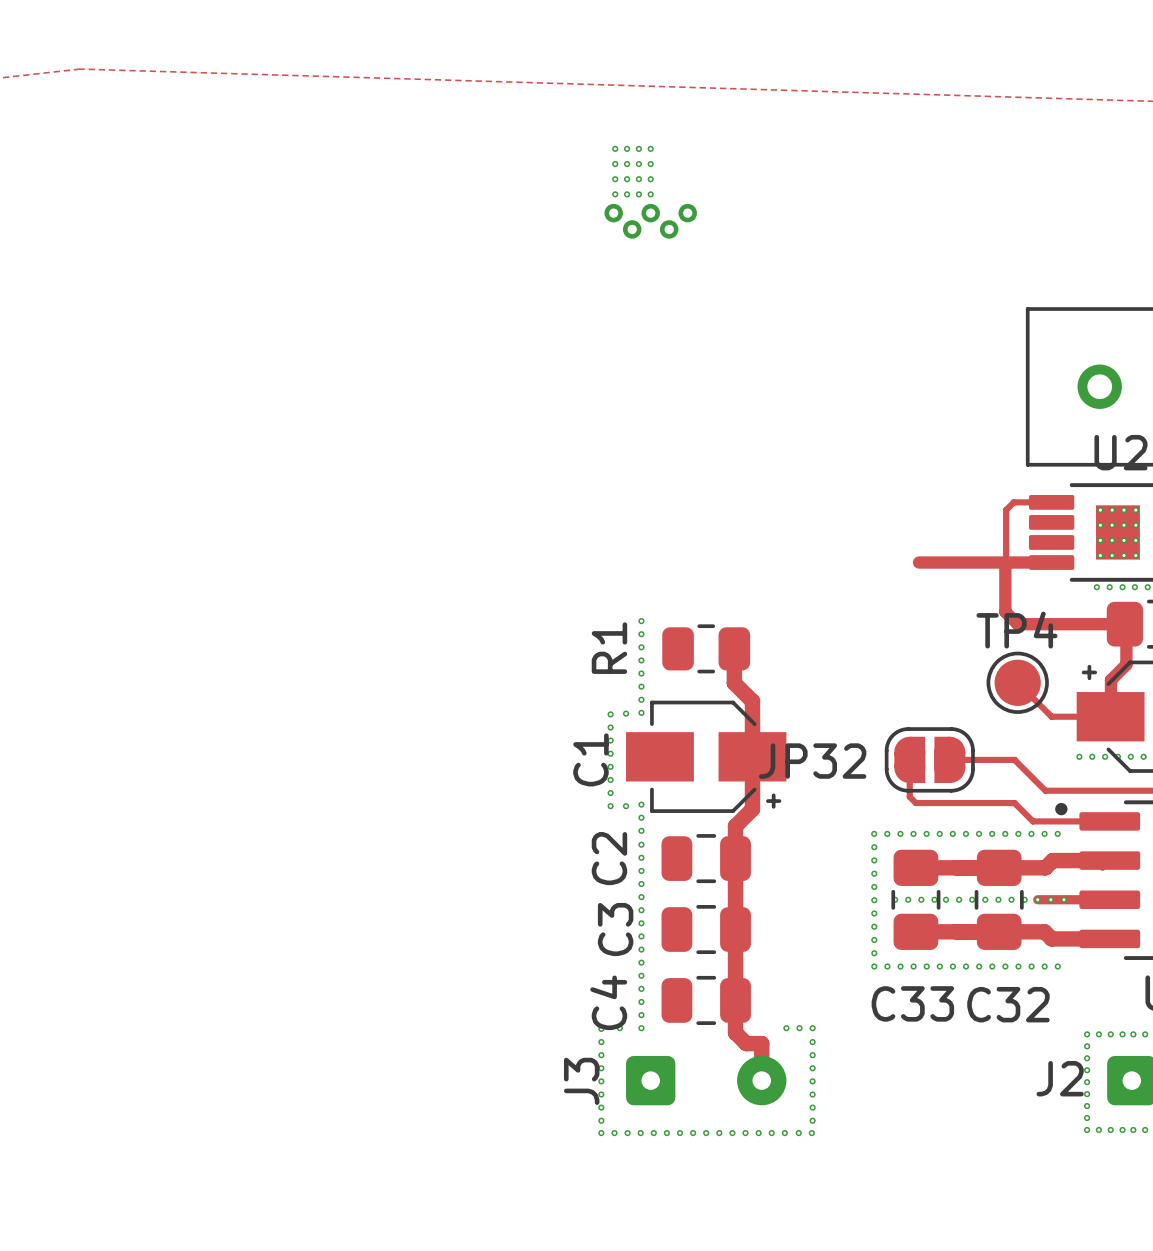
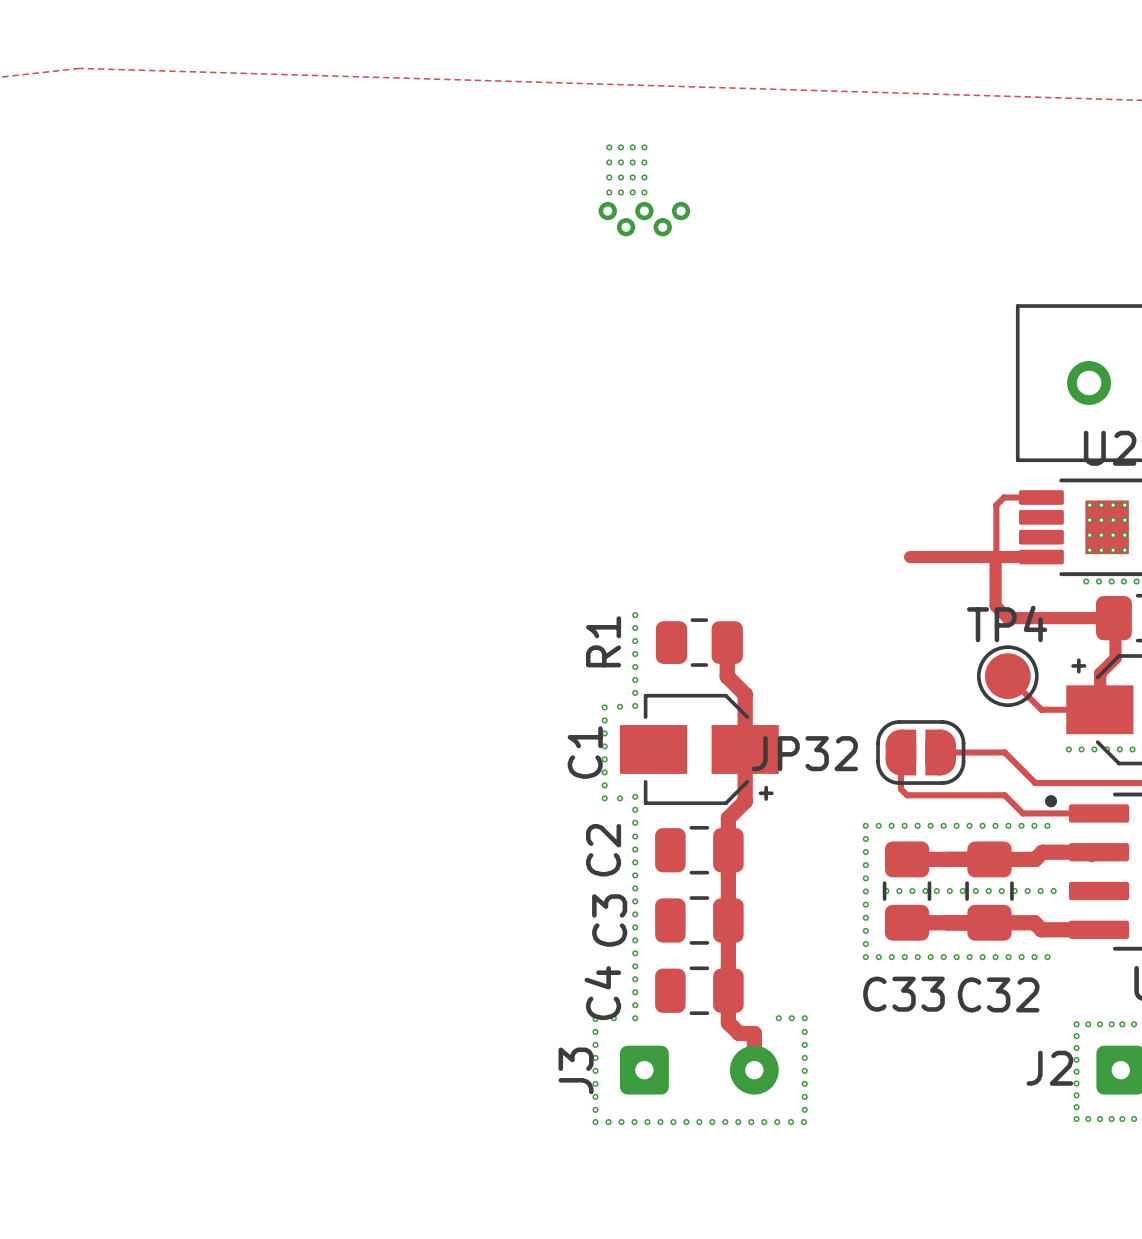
track: (1037, 899) (1109, 899) -> none

